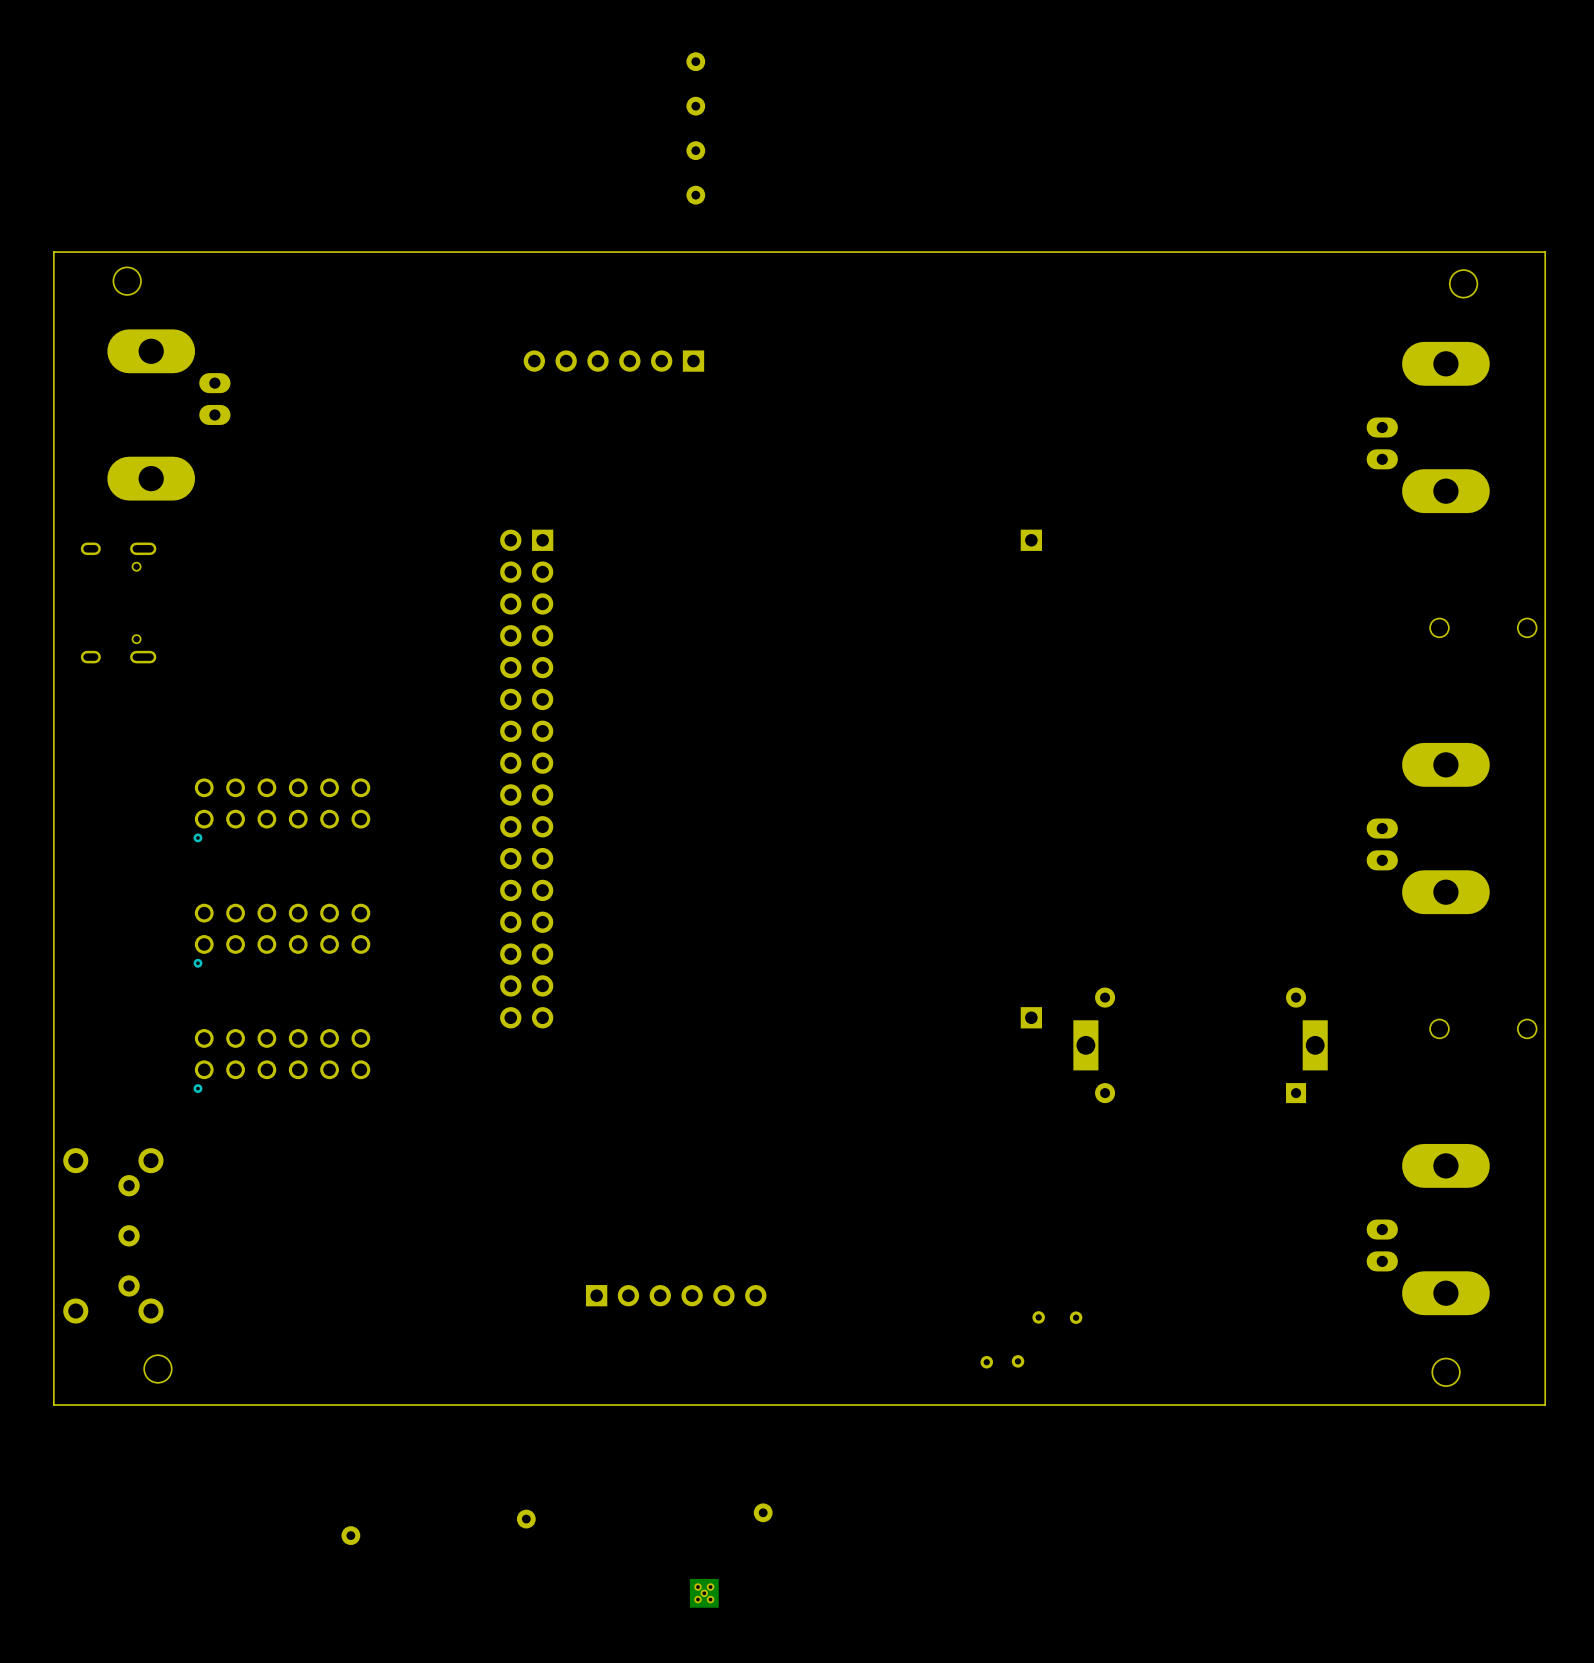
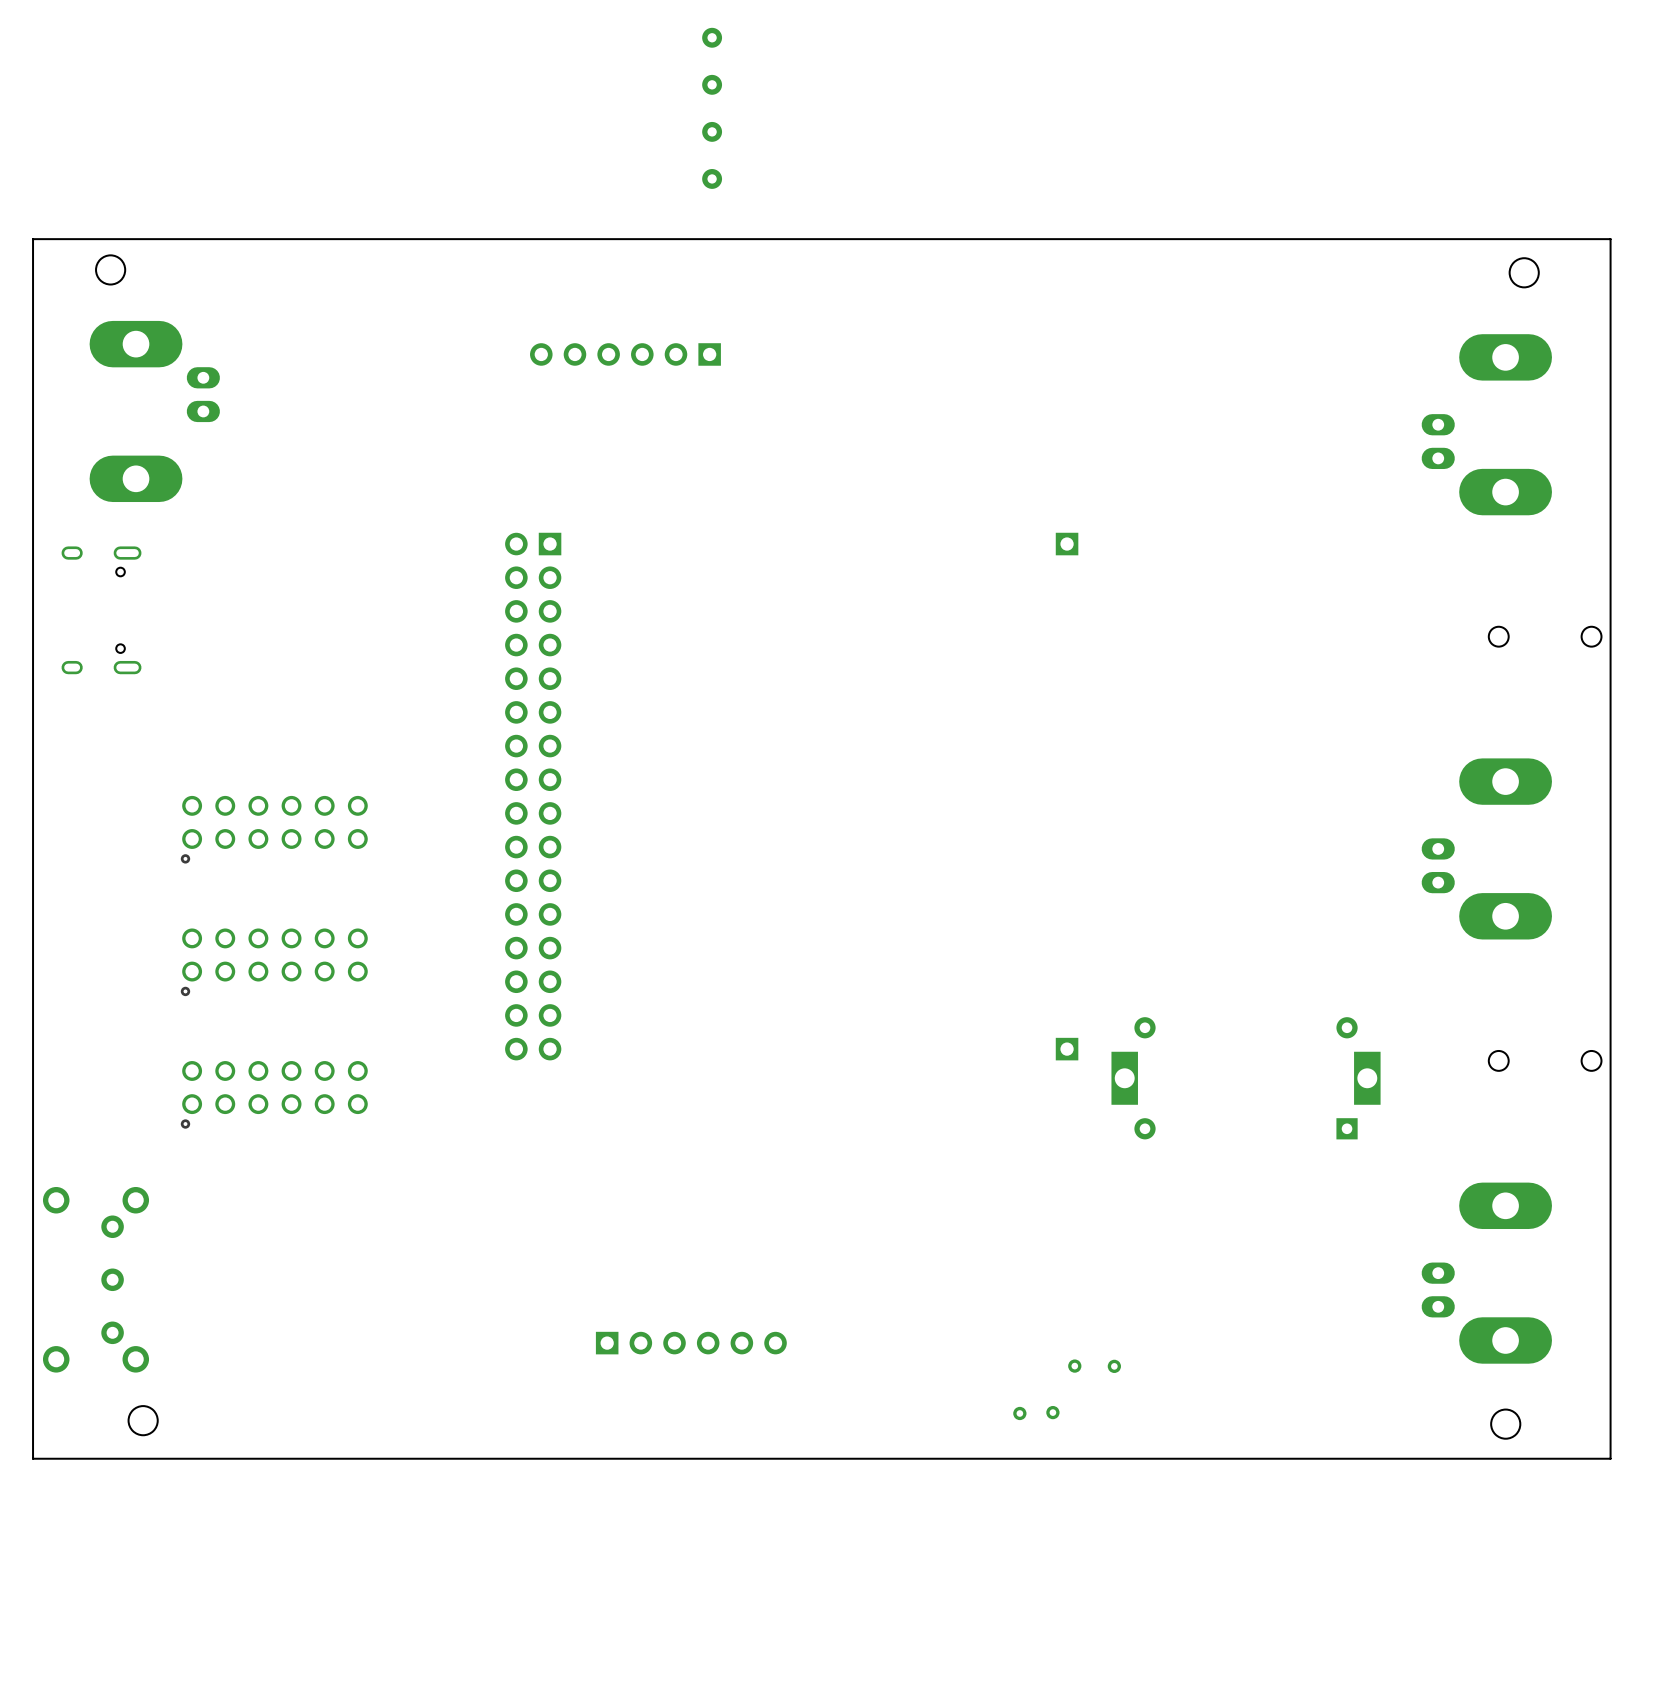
part: (763, 1512) -> none
part: (526, 1519) -> none
part: (350, 1535) -> none
part: (704, 1593) -> none

